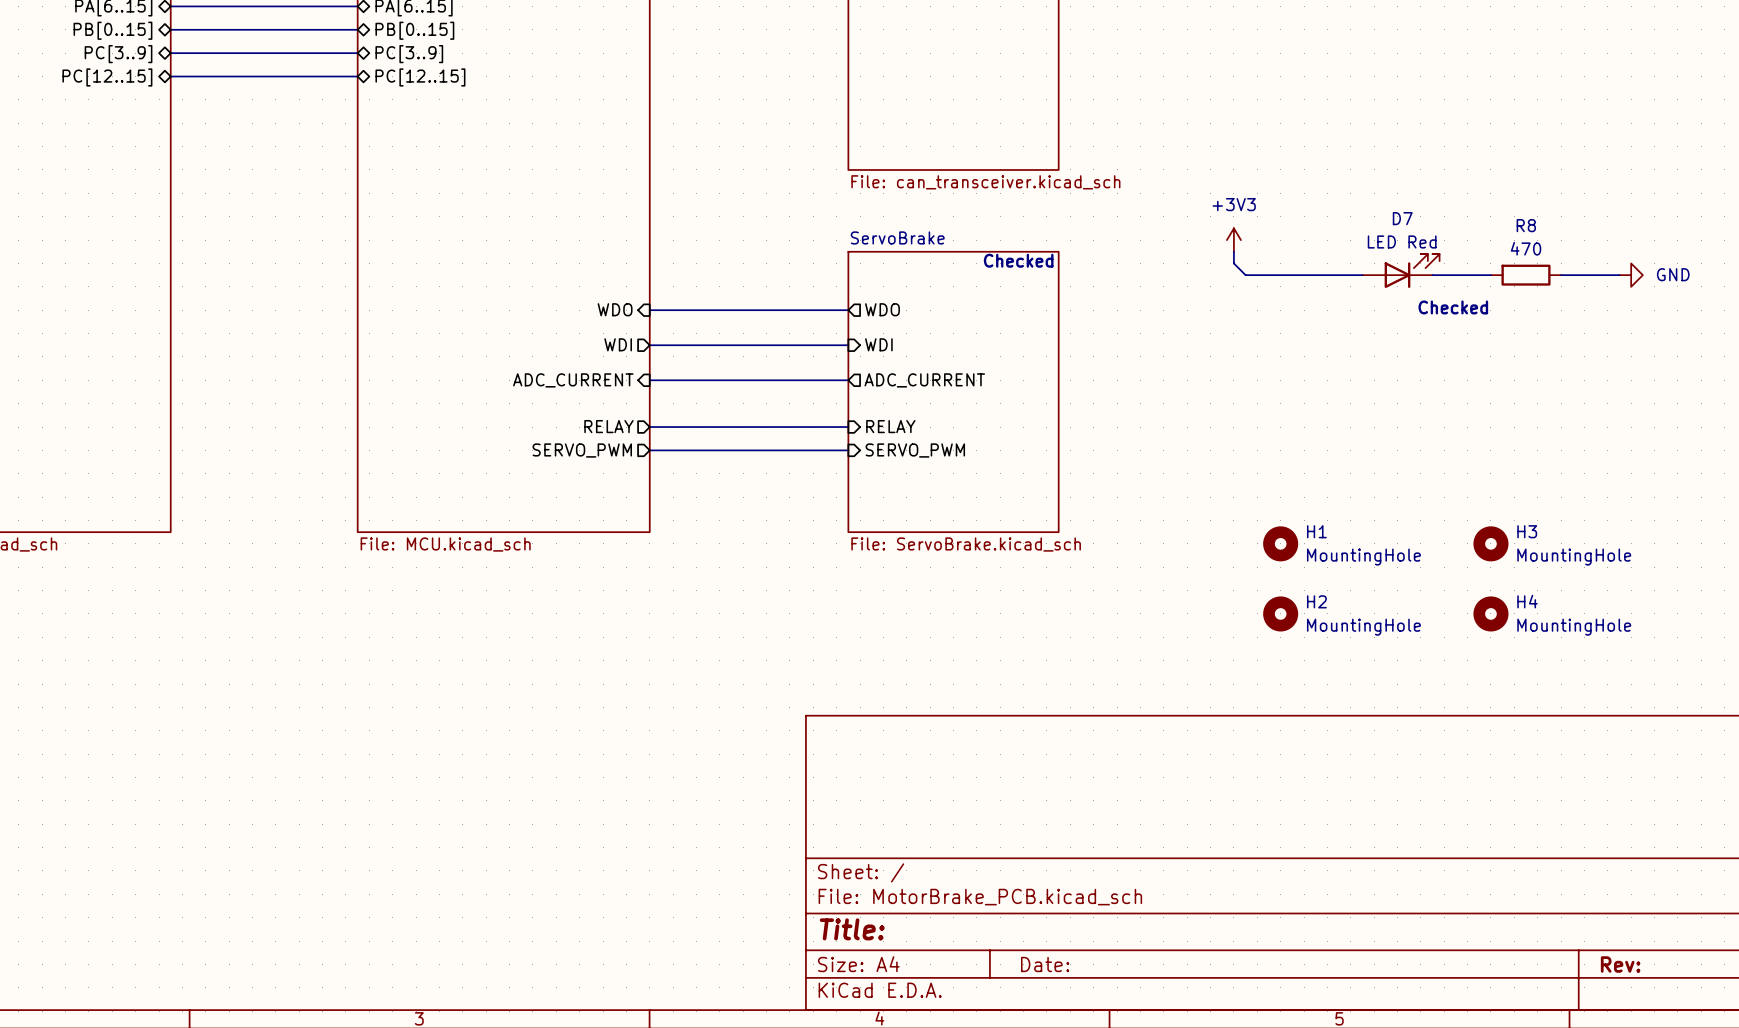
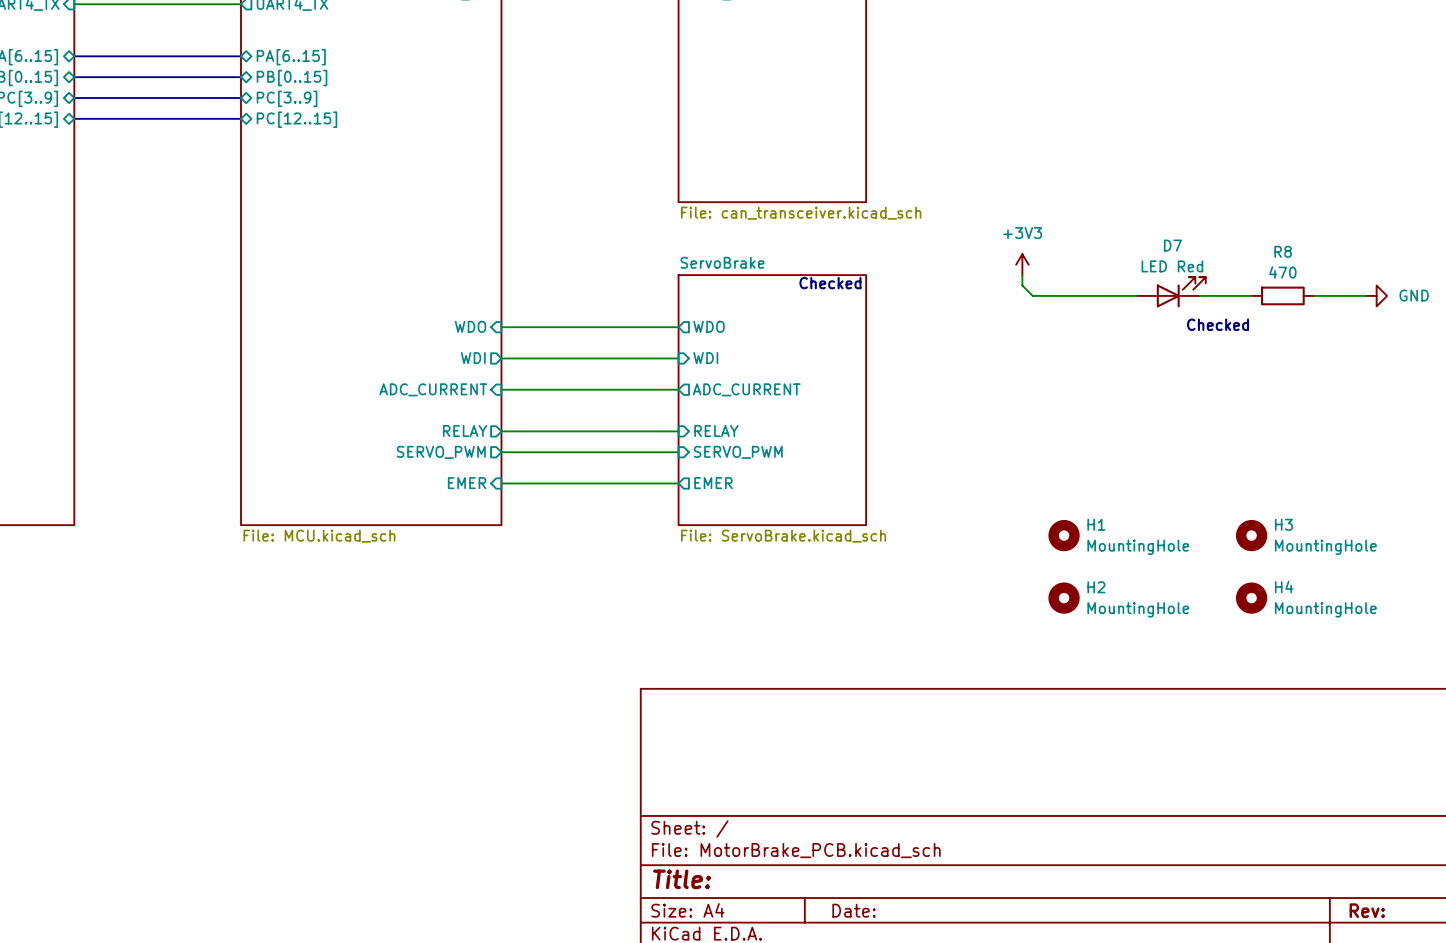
sheet pin: none -> EMER (467, 483)
wire: none -> (501, 483) (678, 483)
sheet pin: none -> EMER (713, 483)

